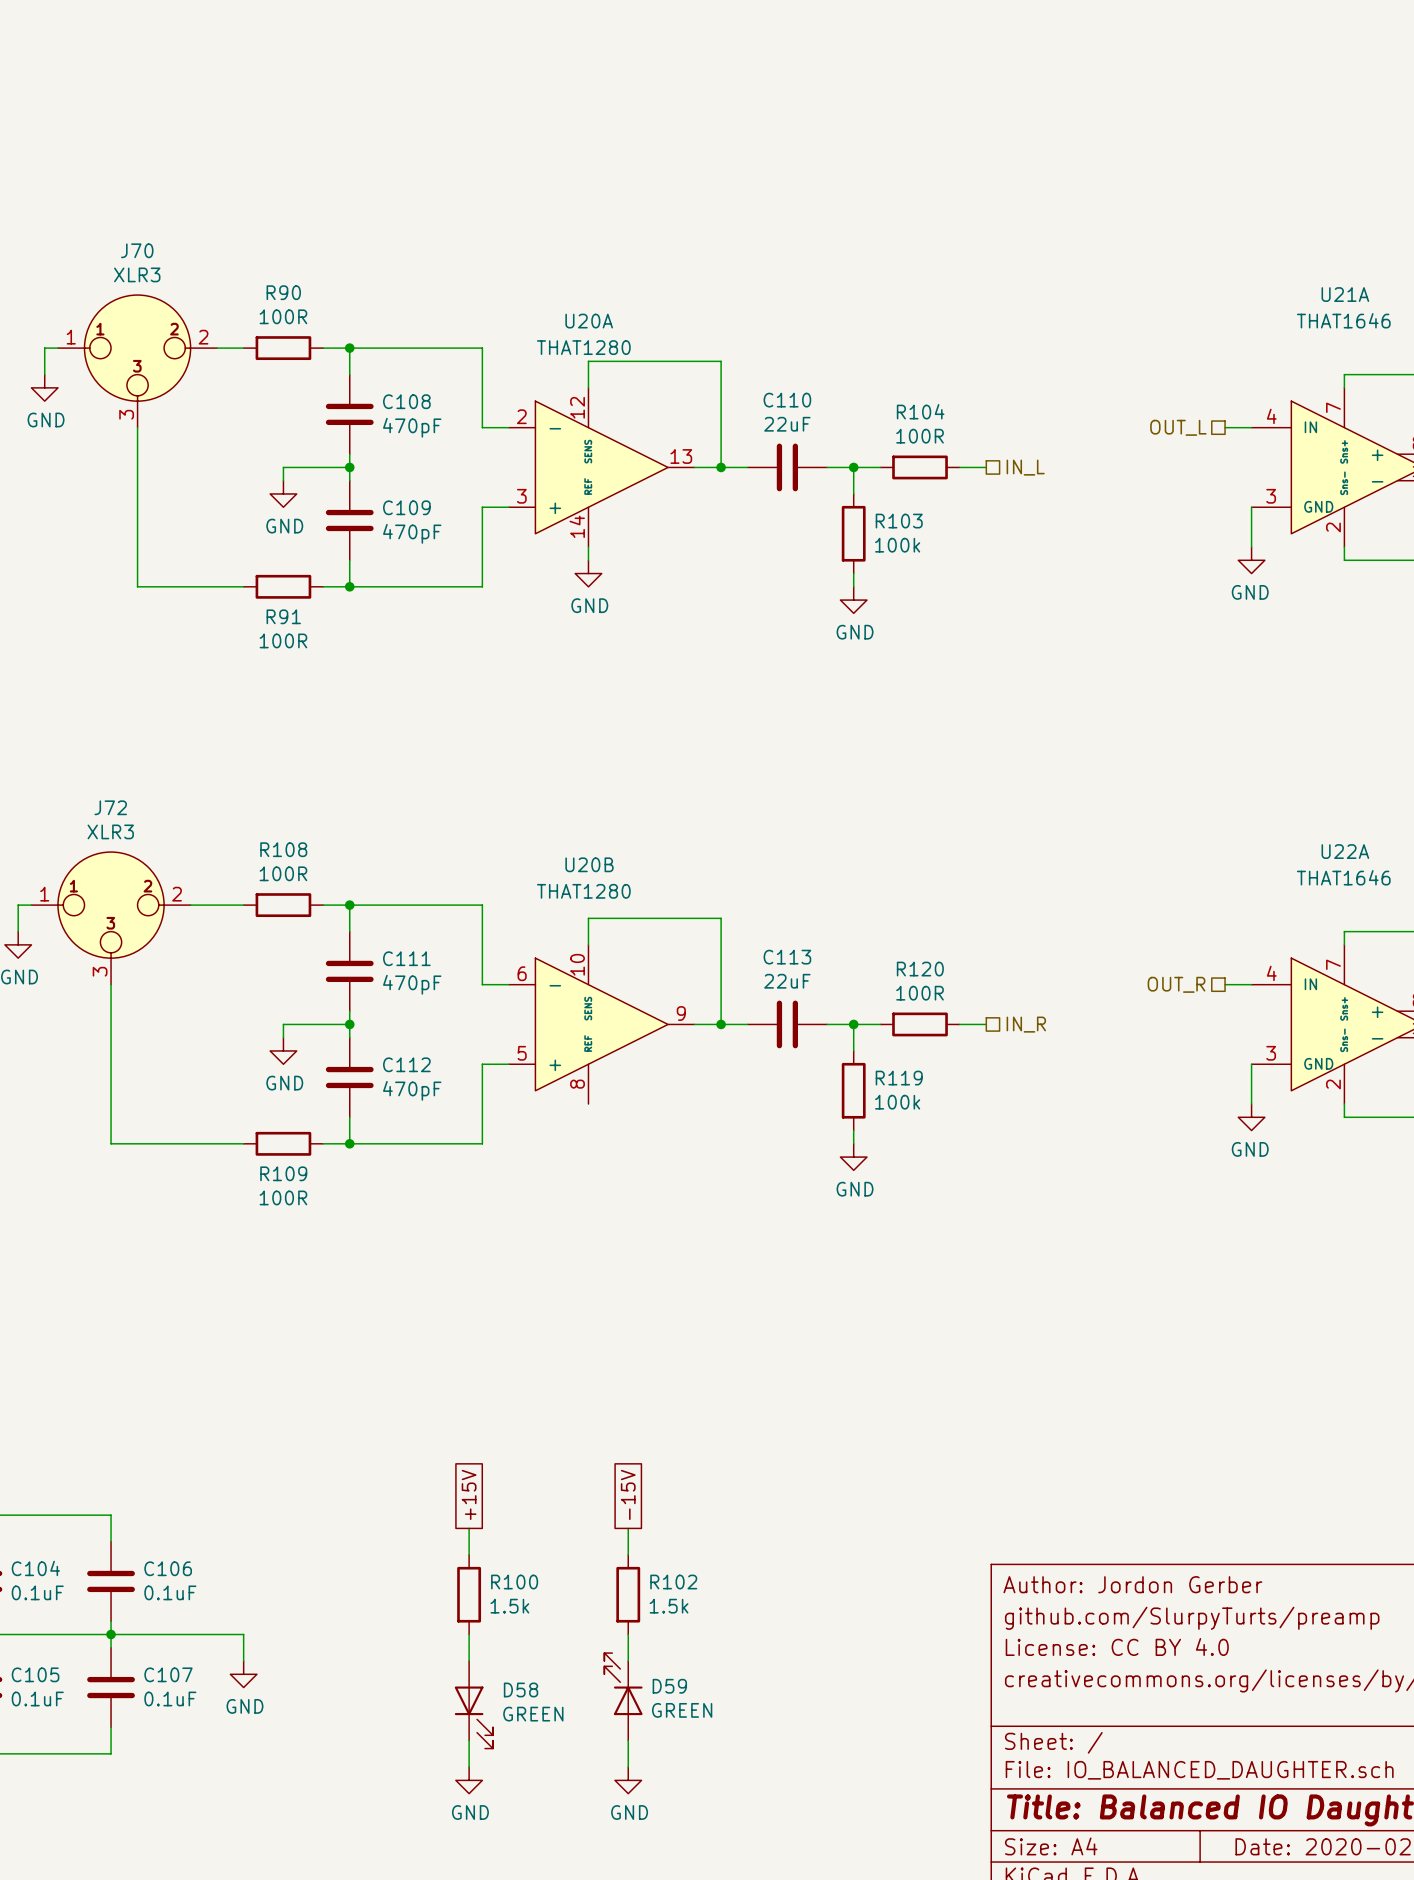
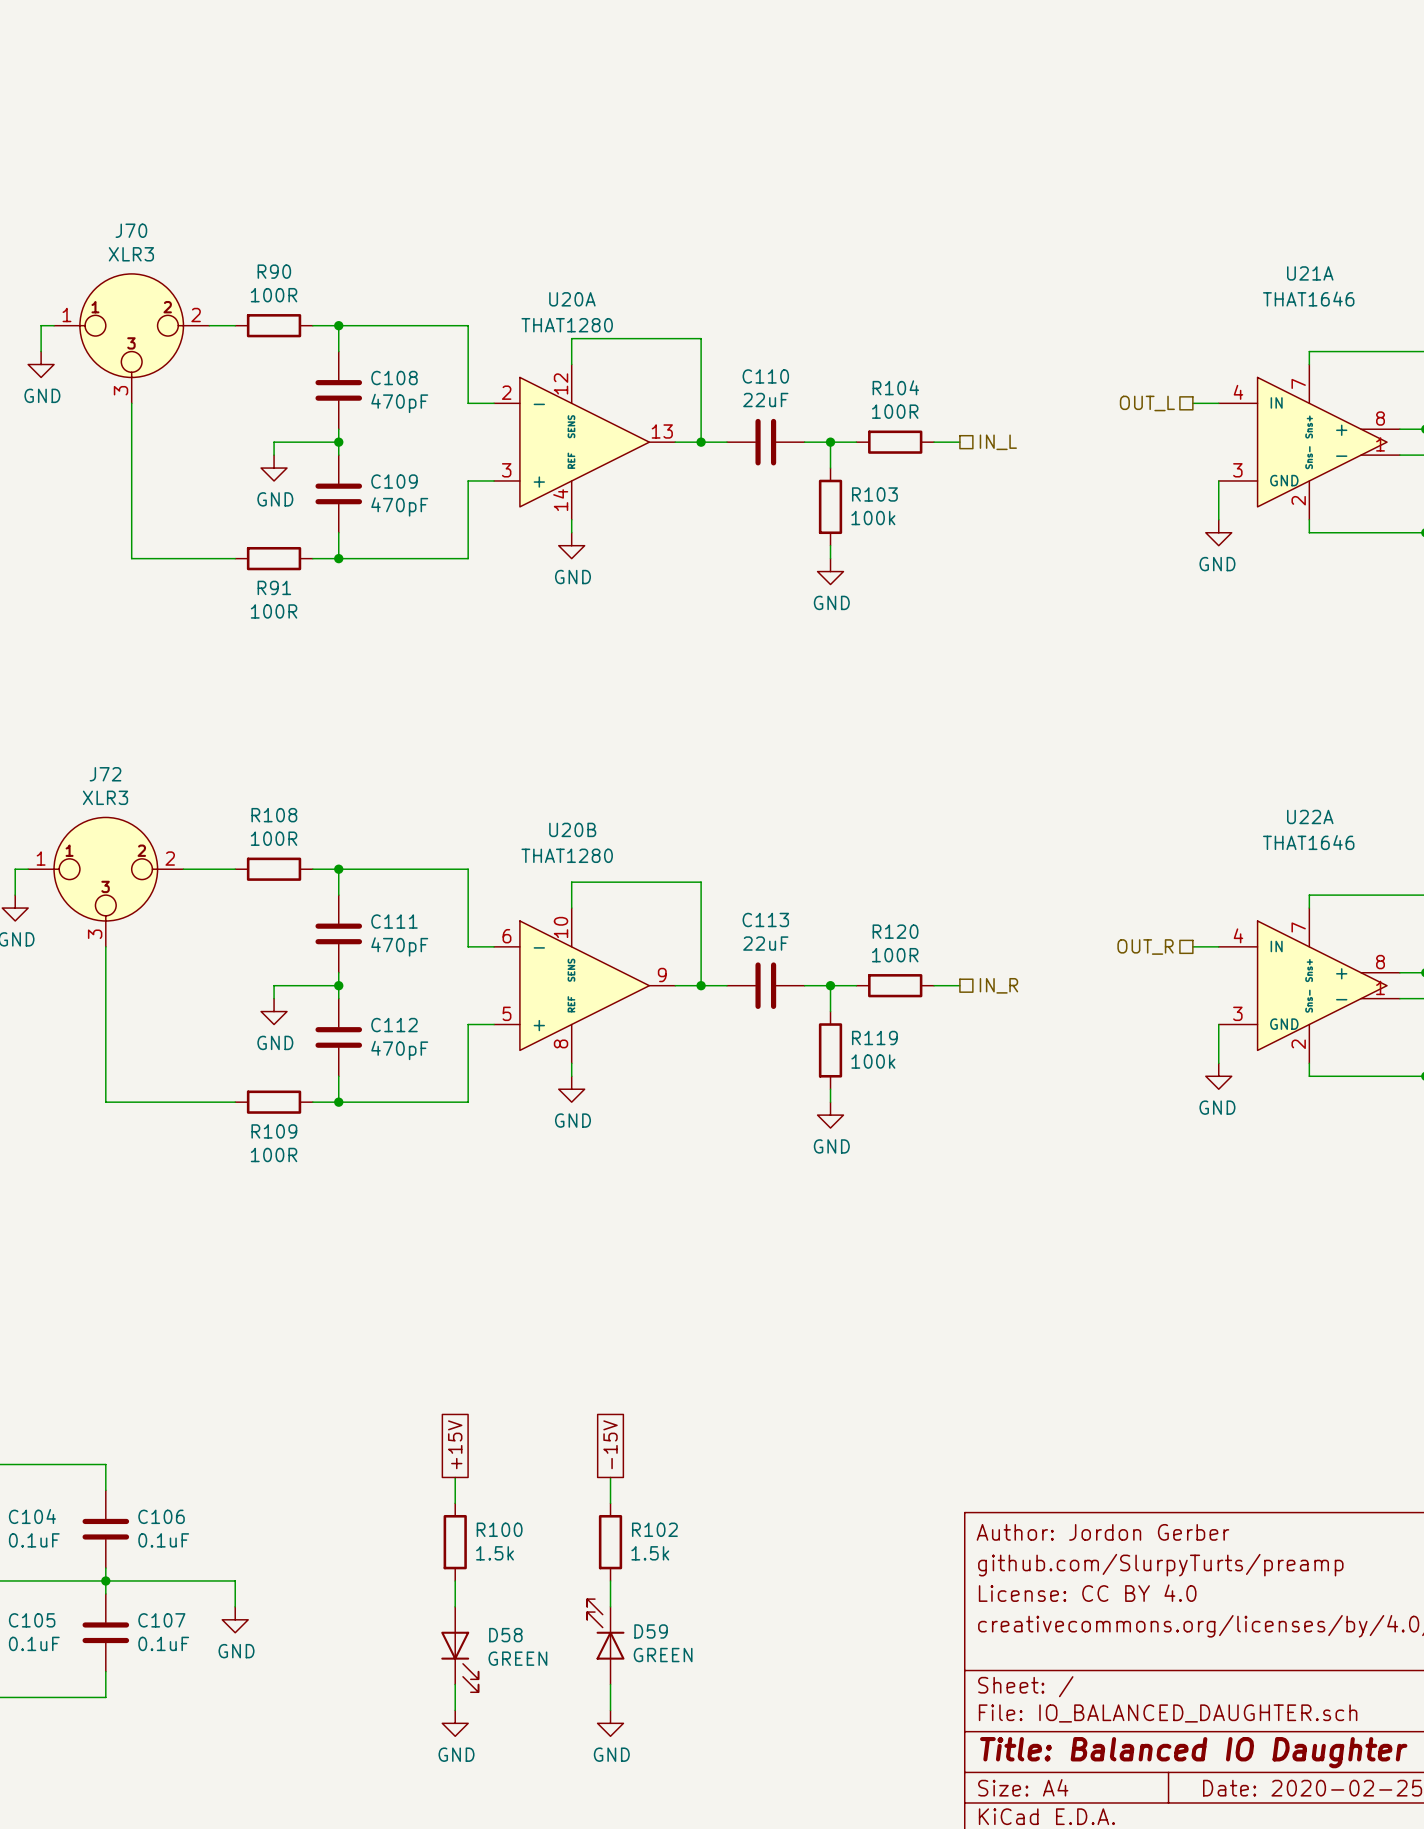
wire: none -> (571, 1063) (571, 1076)
power symbol: none -> GND (571, 1089)

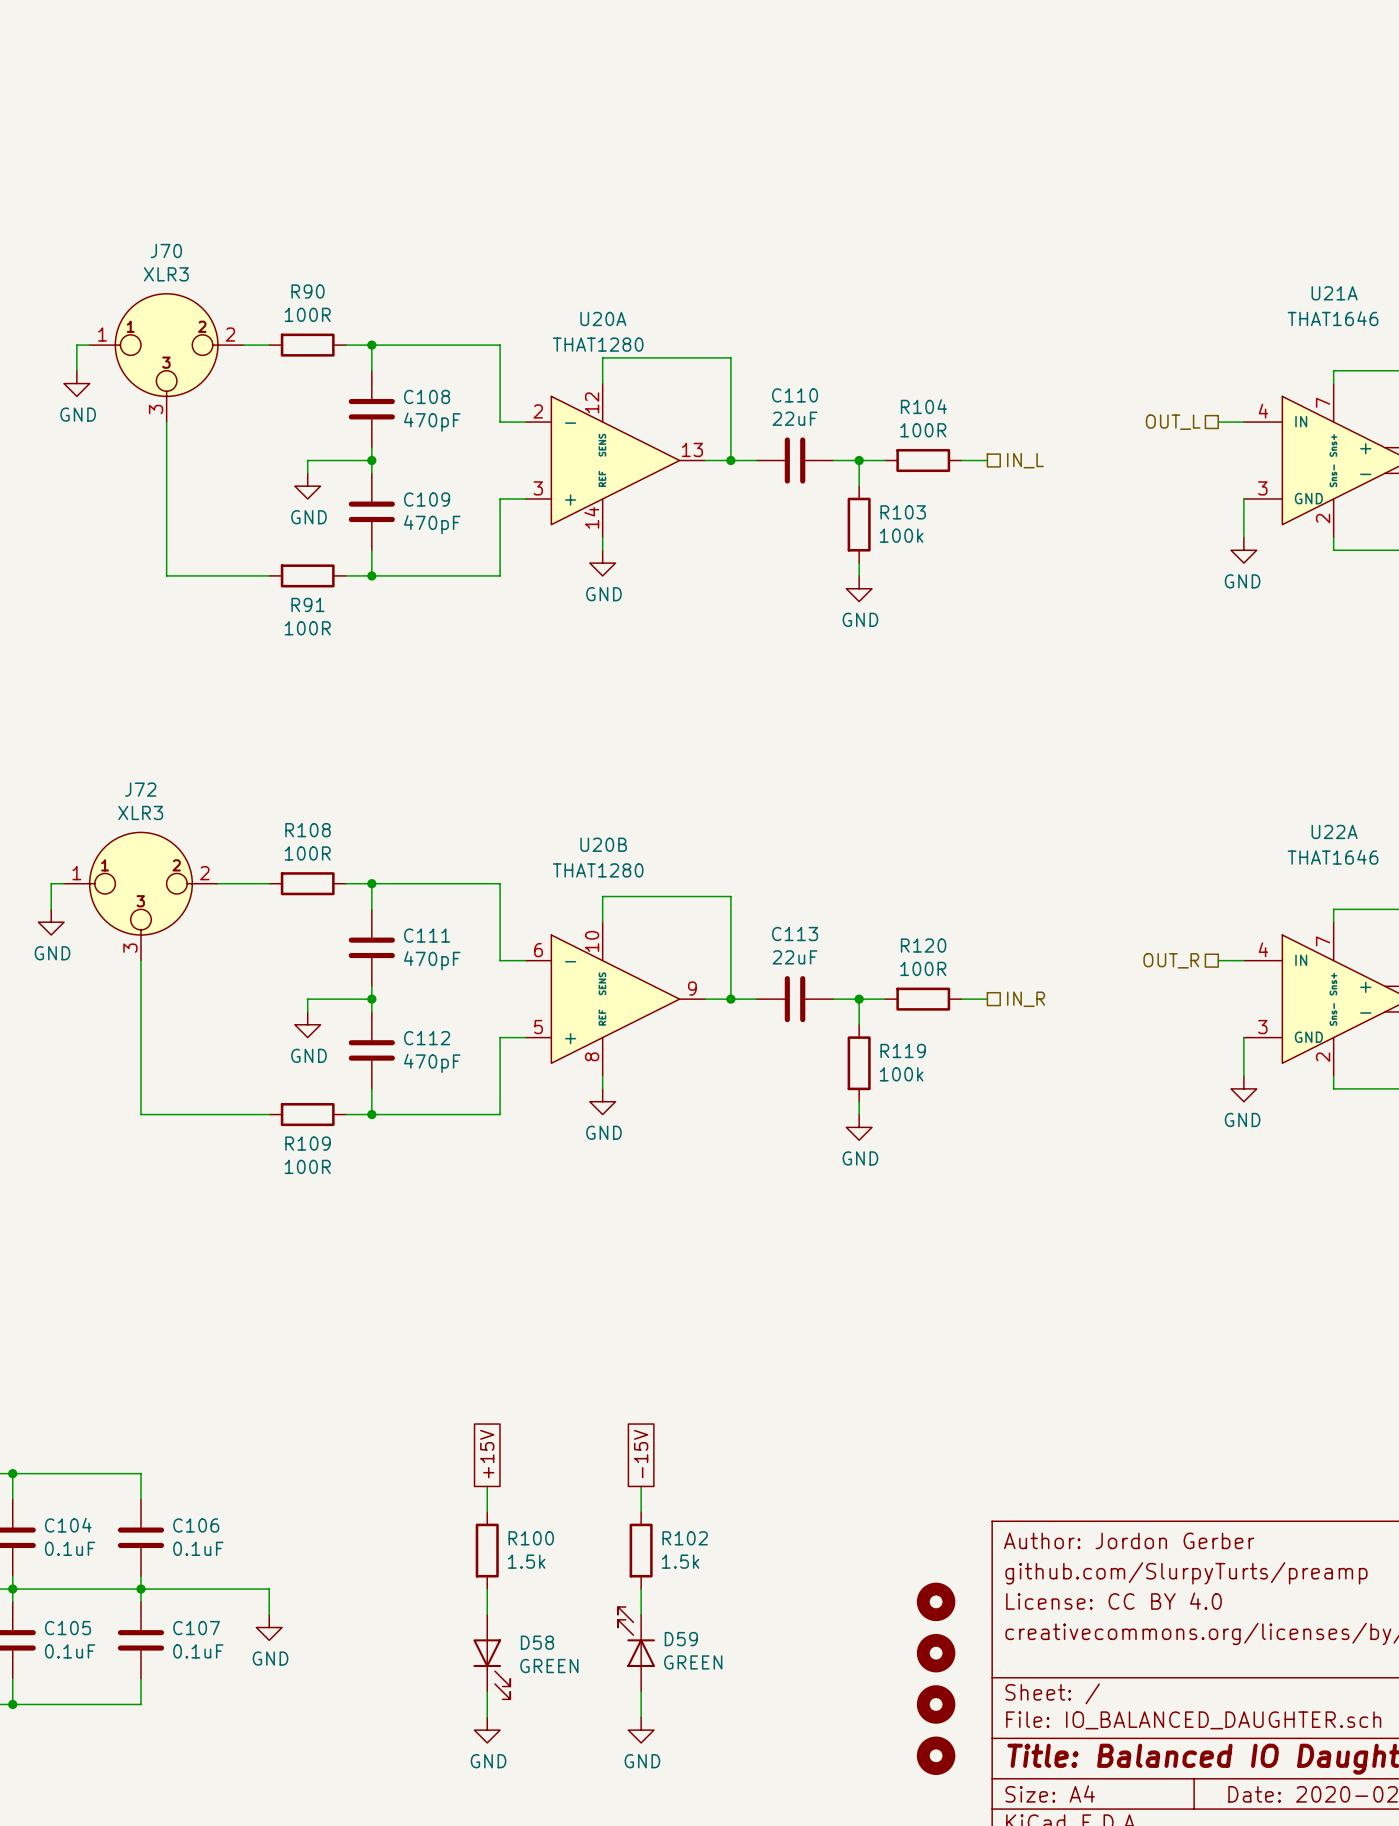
part: none -> (936, 1601)
part: none -> (936, 1653)
part: none -> (936, 1704)
part: none -> (936, 1755)

